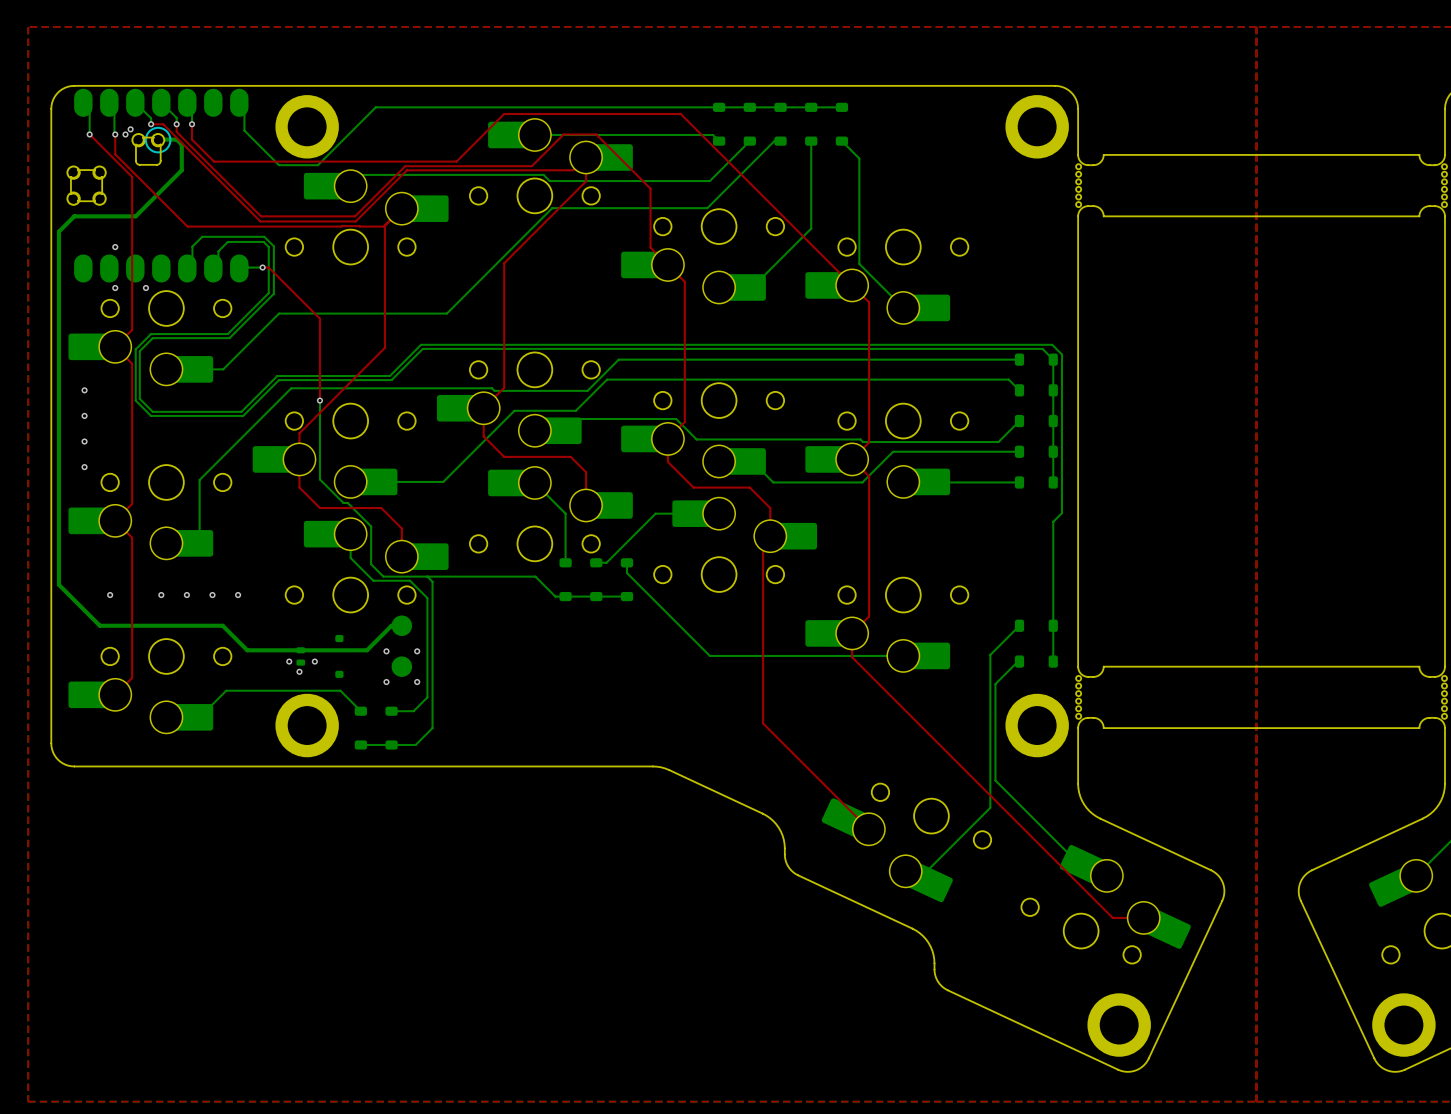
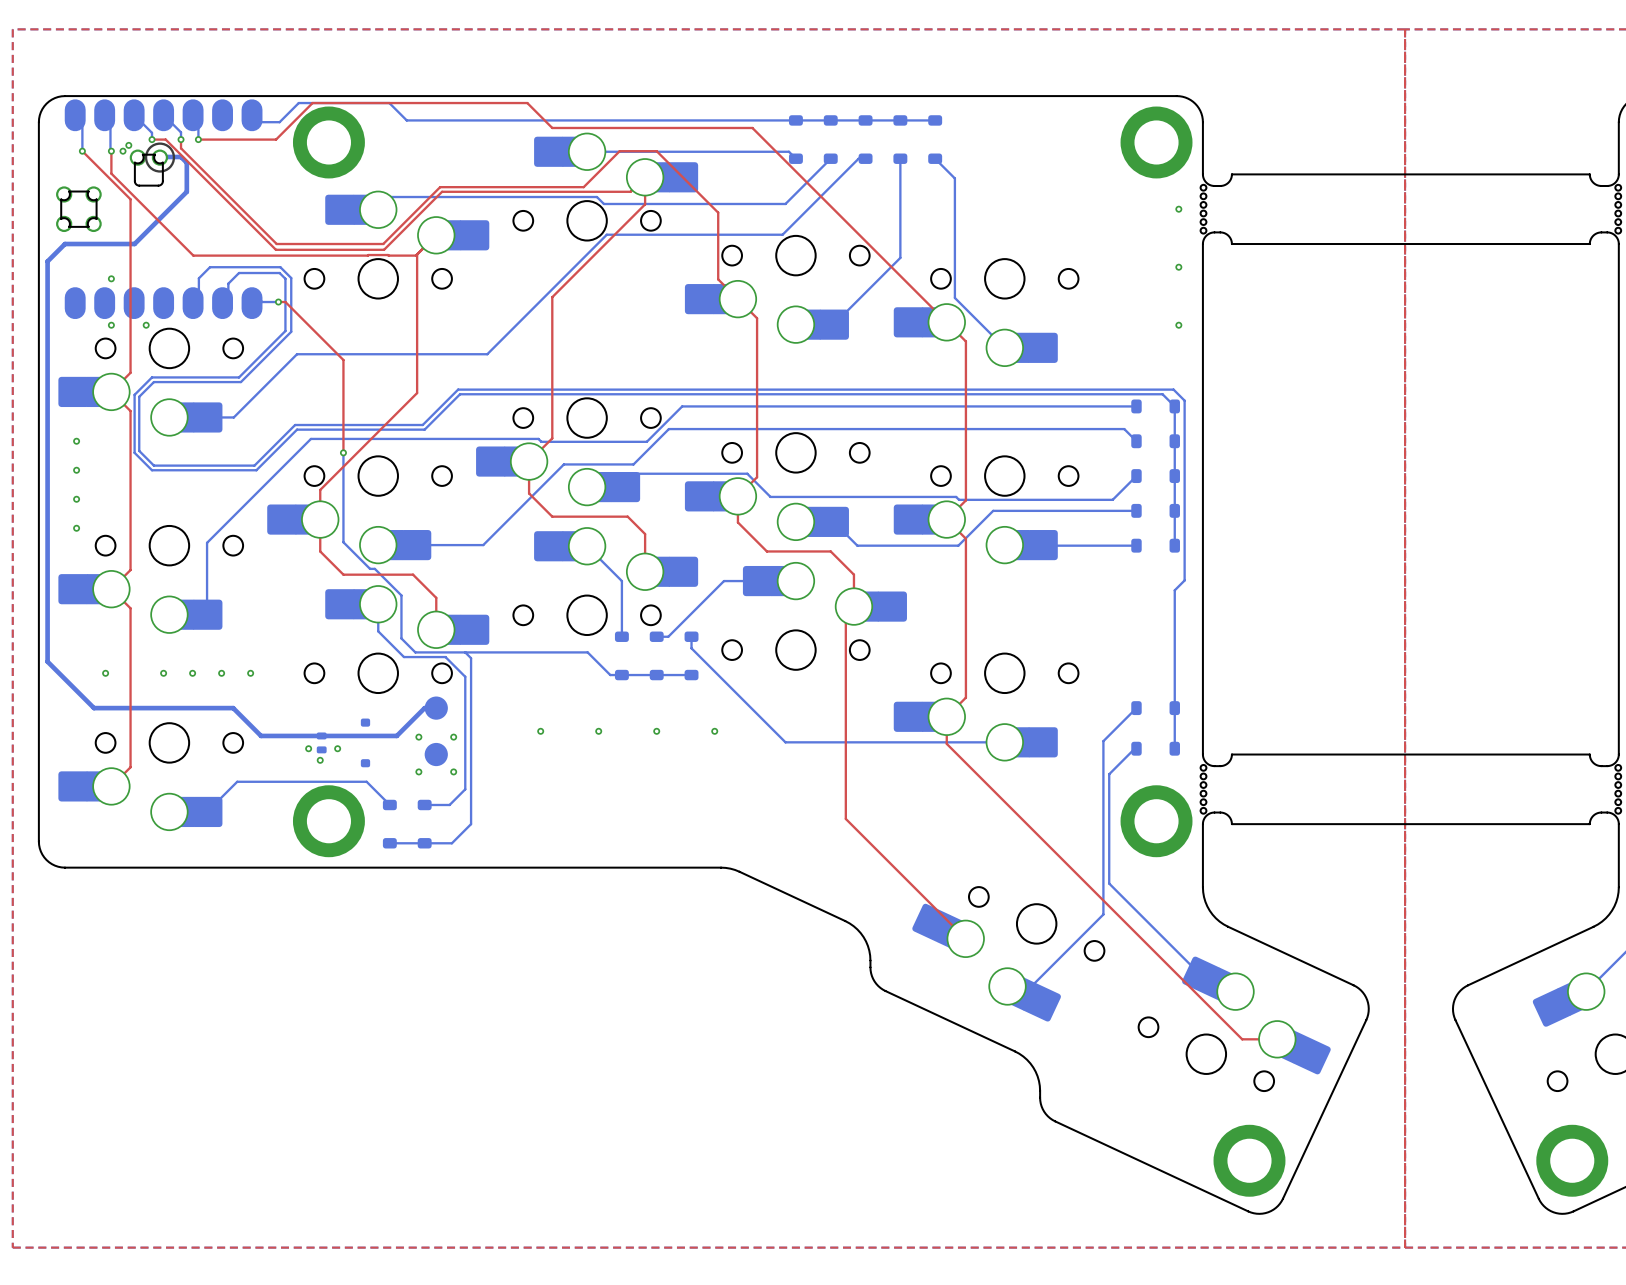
bottom track: (375, 107) (317, 165) (279, 165) (244, 130) (244, 107) -> (406, 120) (389, 103) (298, 103) (279, 122) (252, 120)
top track: (504, 114) (456, 161) (214, 161) (192, 139) (192, 124) -> (552, 127) (527, 103) (312, 103) (276, 139) (198, 139)
via: none -> (1178, 209)
via: none -> (1178, 267)
via: none -> (1178, 325)
via: none -> (540, 731)
via: none -> (598, 731)
via: none -> (656, 731)
via: none -> (714, 731)

